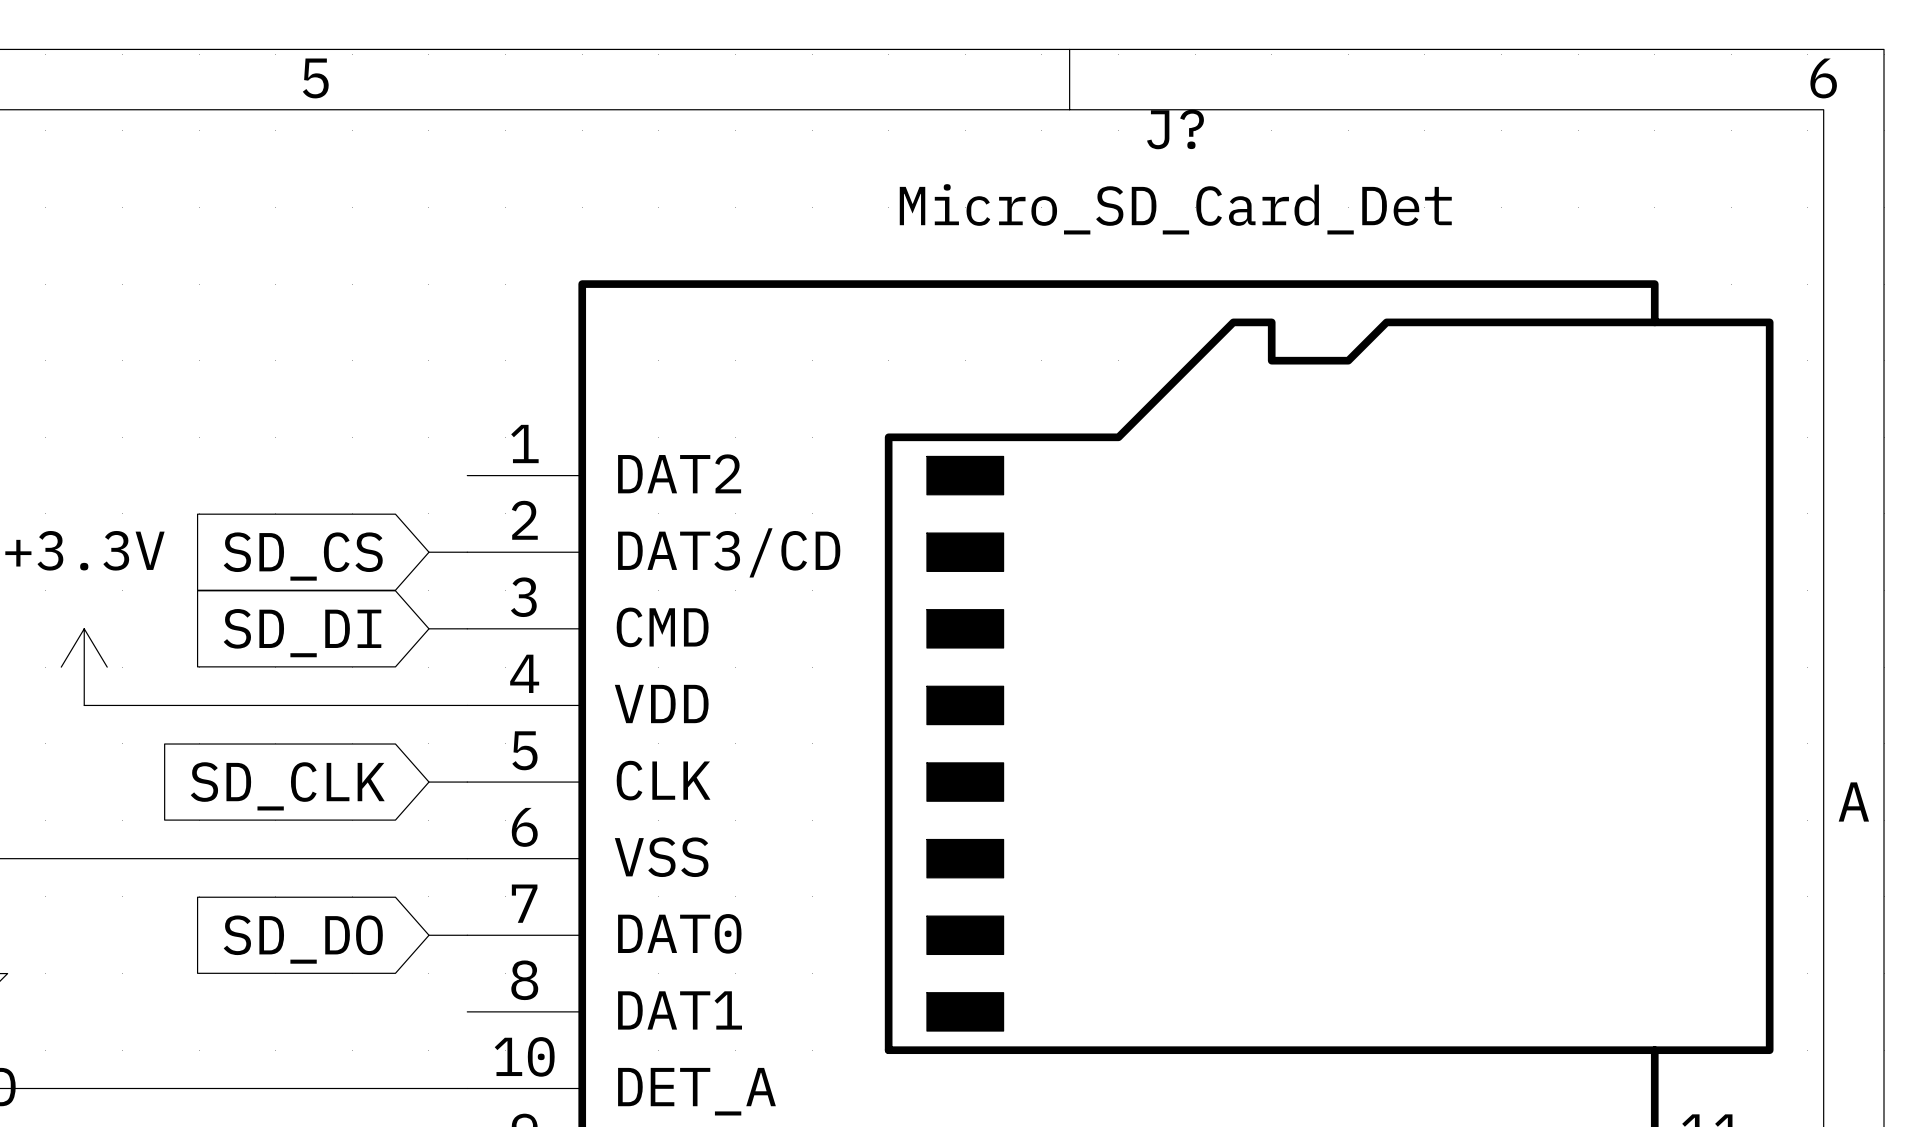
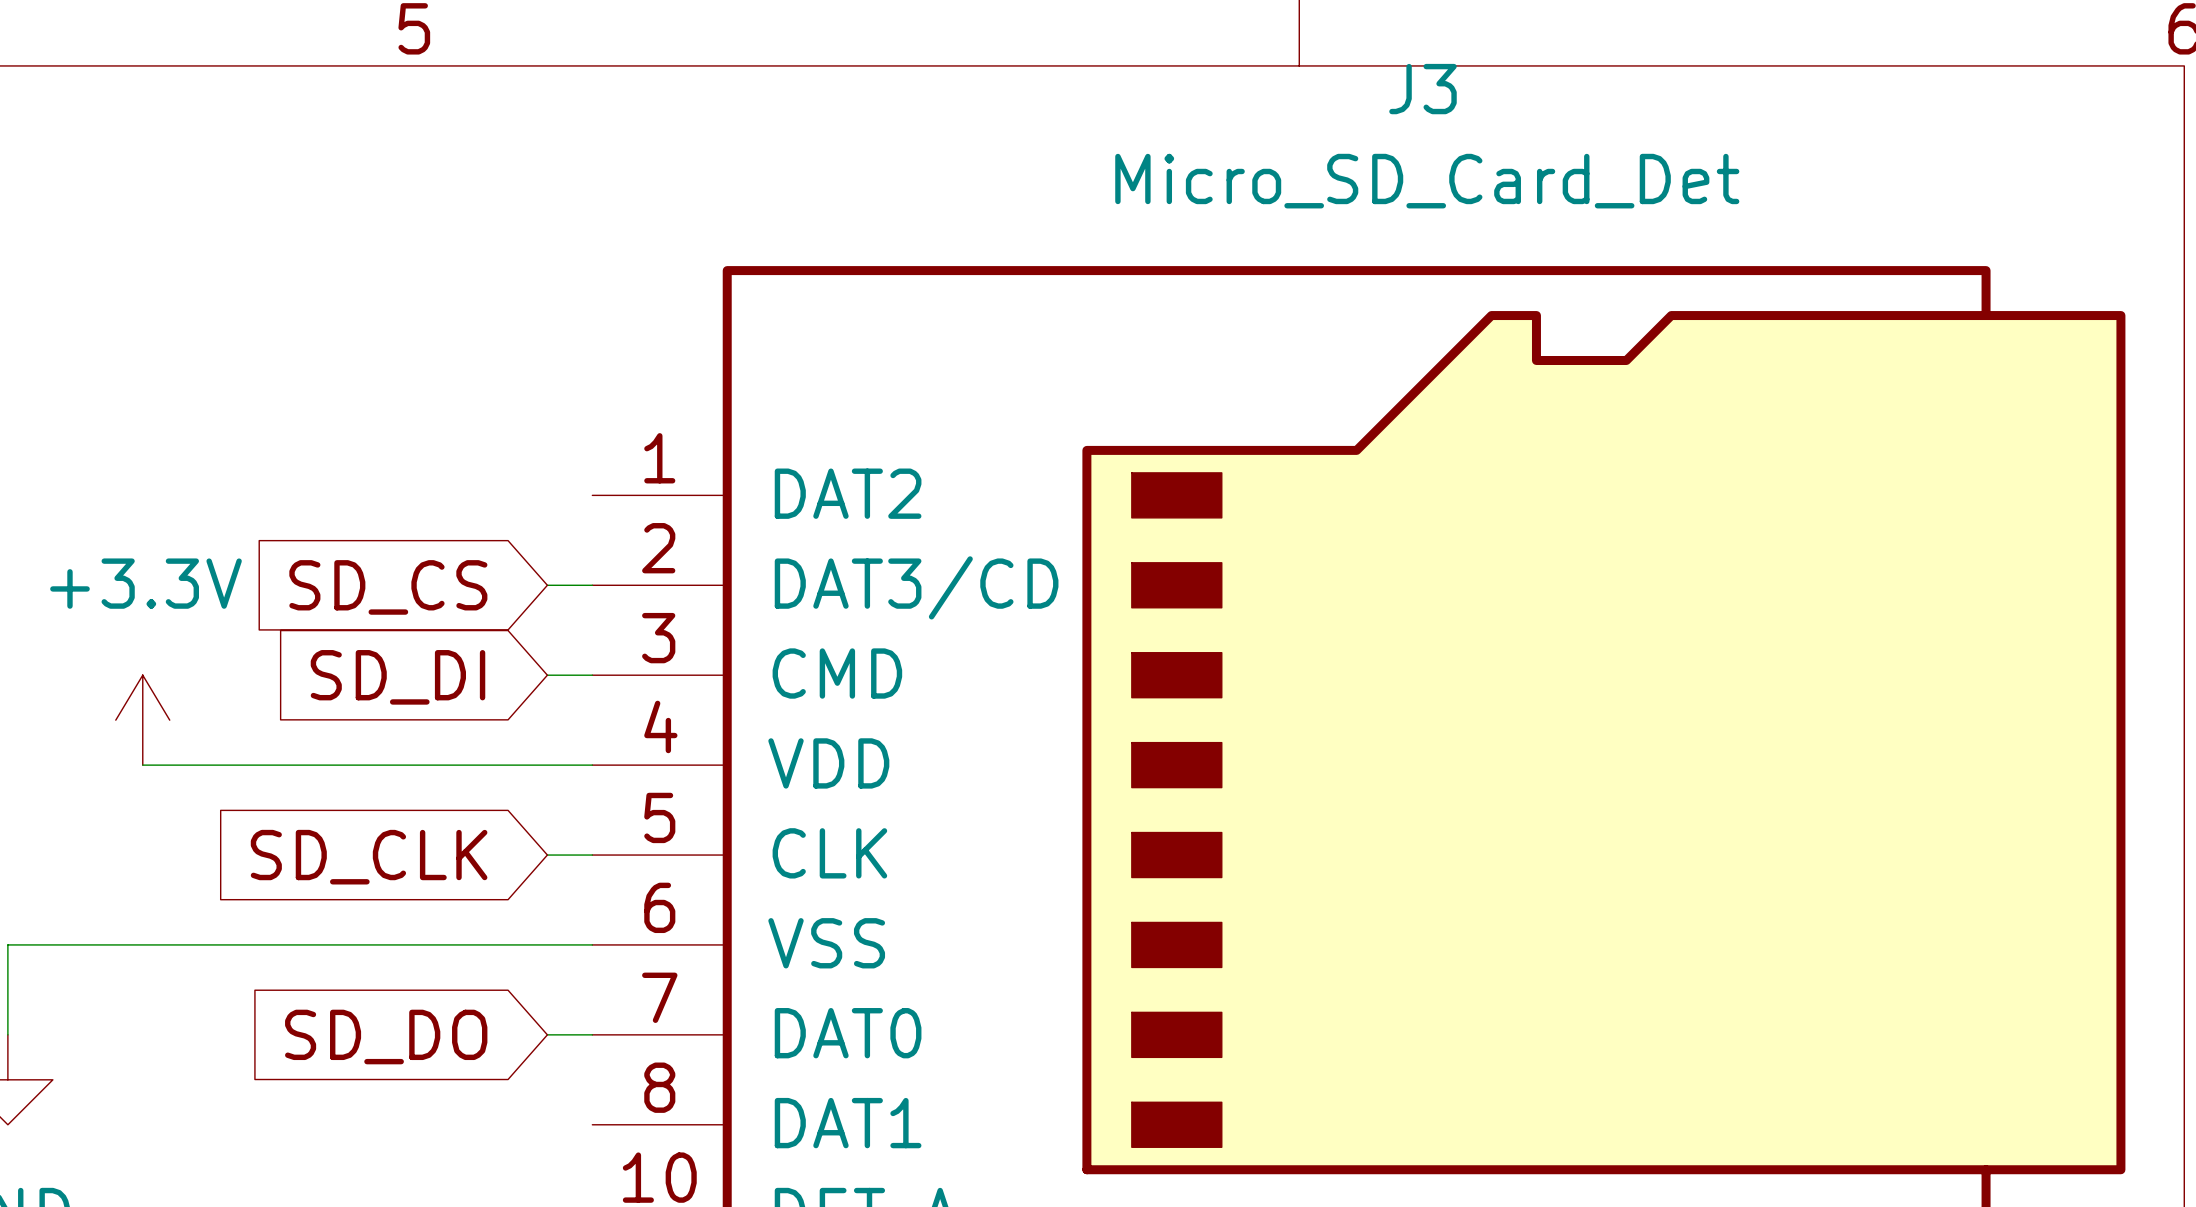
J? name: J? (1175, 129) -> J3 (1423, 89)

